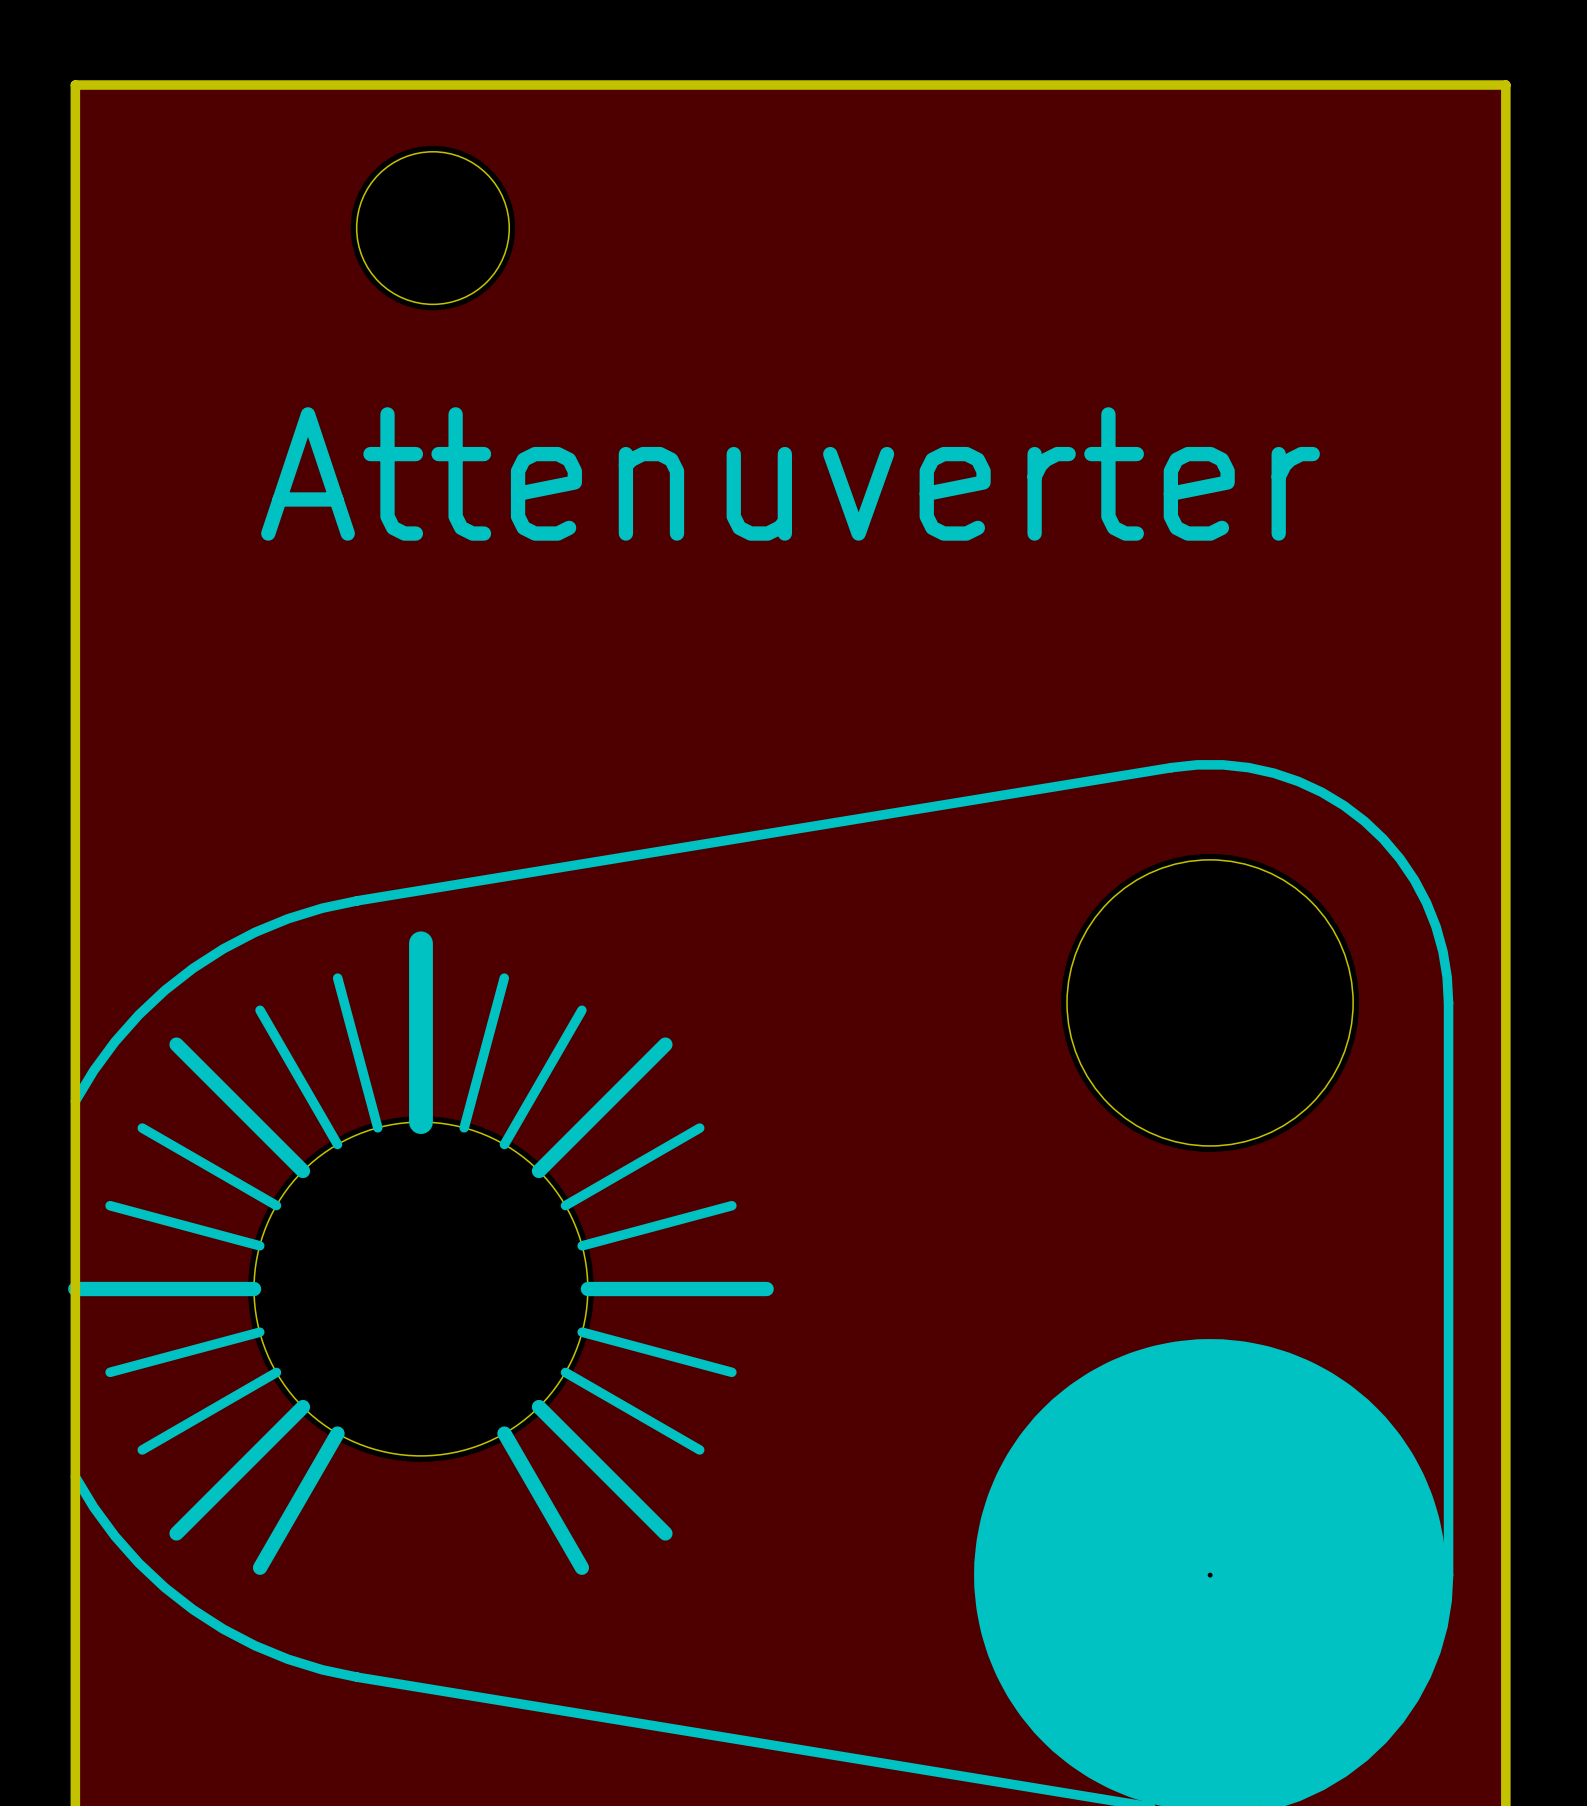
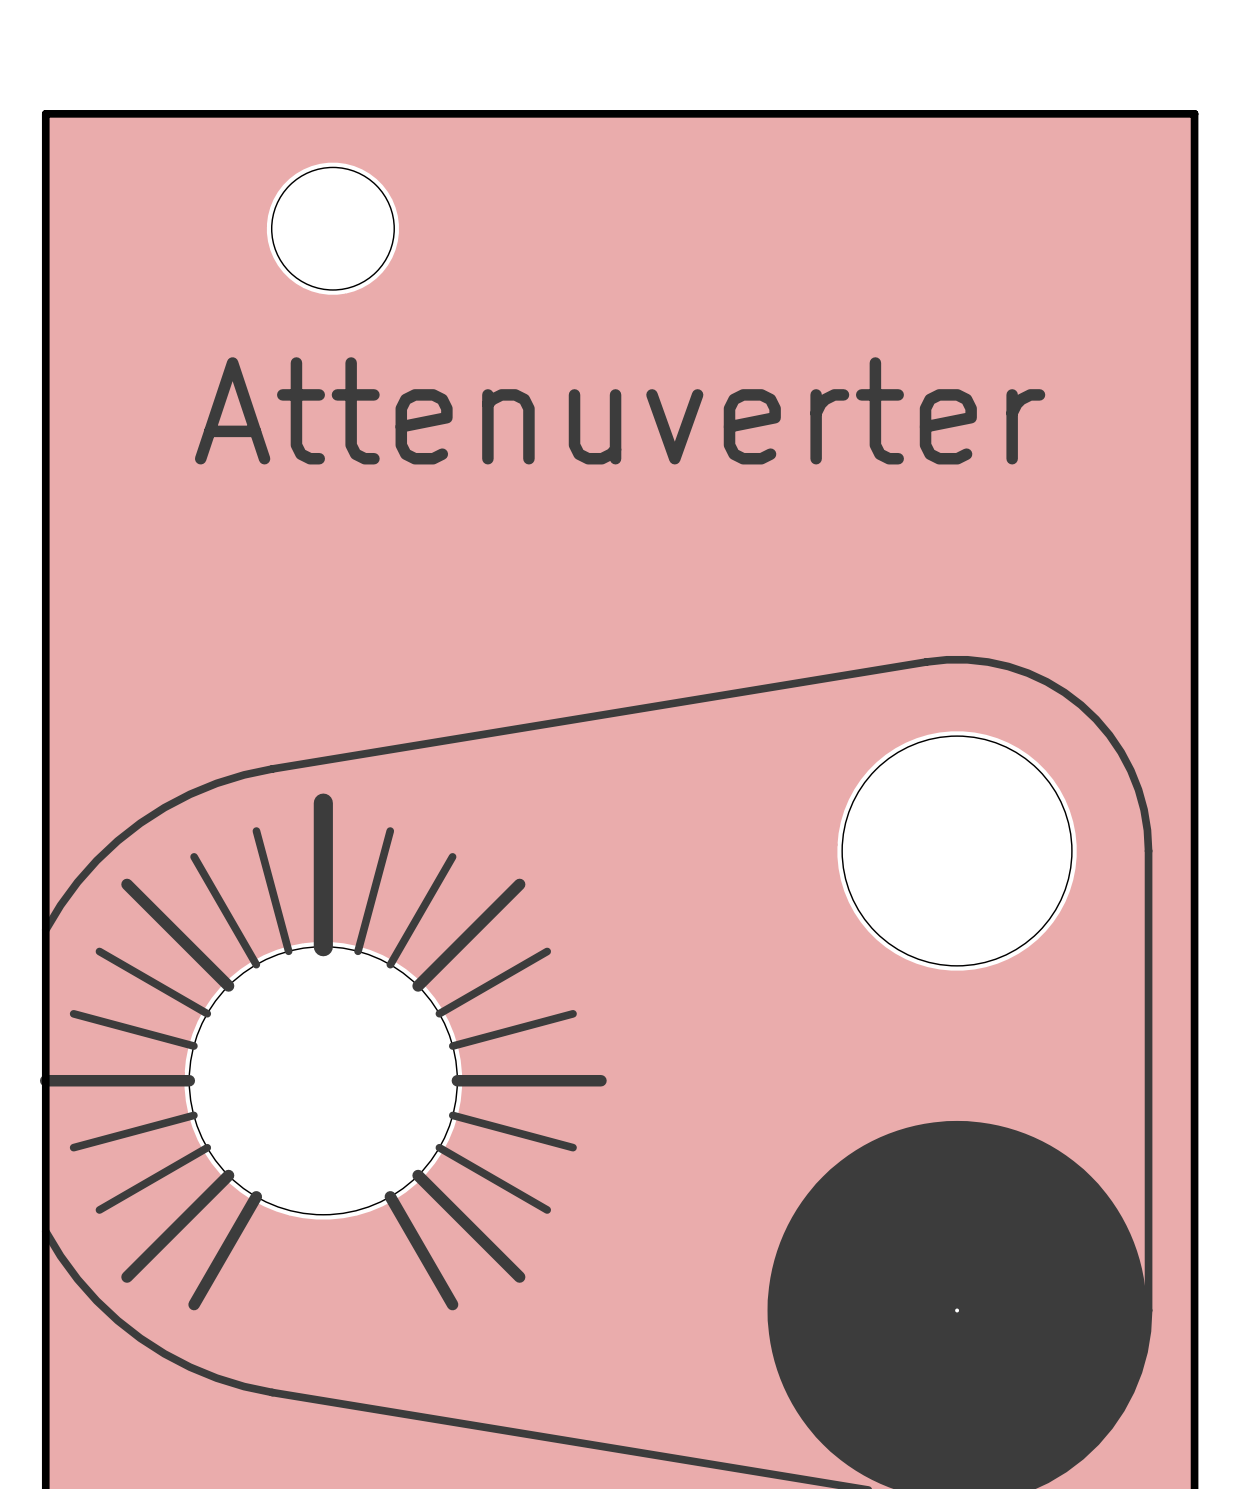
text position: Attenuverter (790, 473) -> Attenuverter (620, 410)

